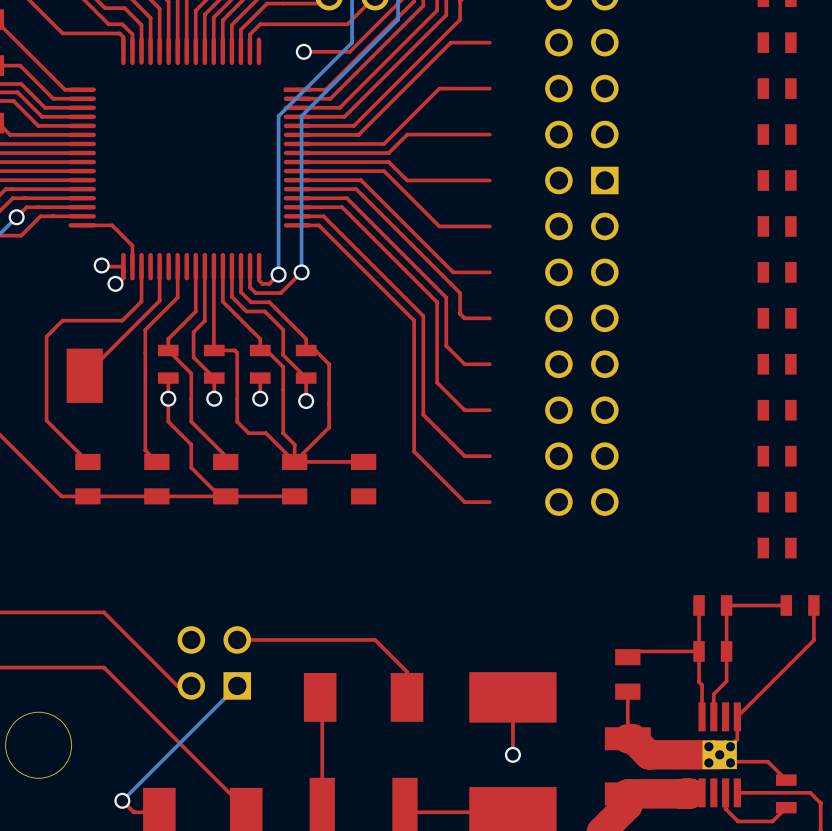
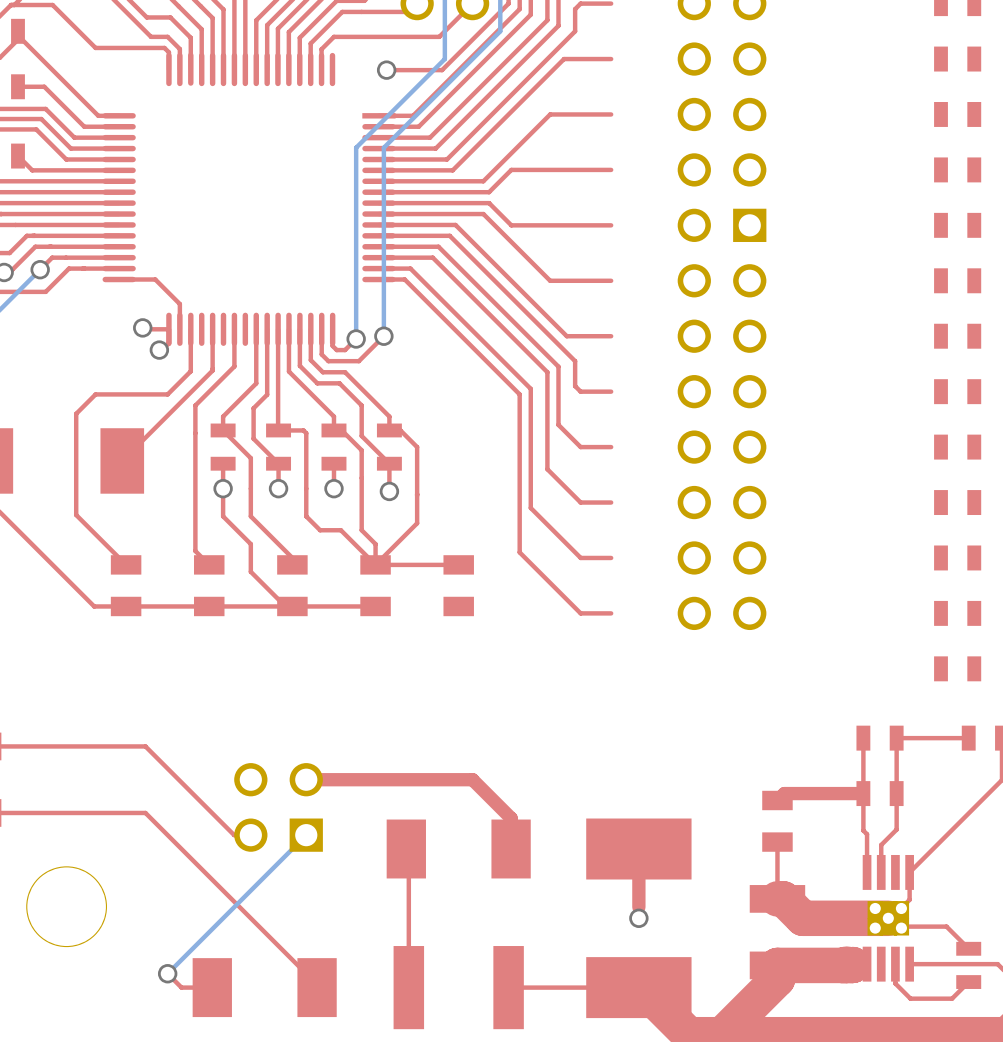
top track width: thin (237, 639) (375, 639) (407, 671) (407, 697) -> thick (306, 779) (472, 779) (511, 818) (511, 849)
top track width: thin (699, 651) (633, 651) (627, 657) -> thick (863, 793) (784, 793) (777, 800)
top track width: thin (512, 697) (512, 745) -> thick (638, 849) (638, 907)

